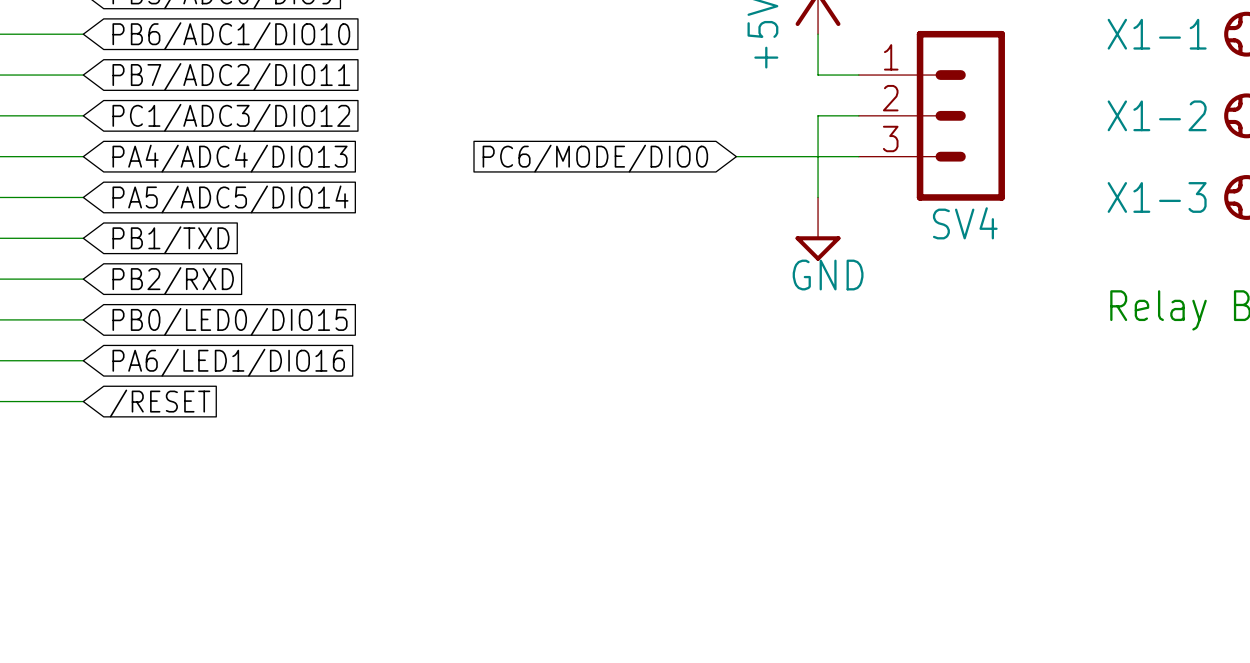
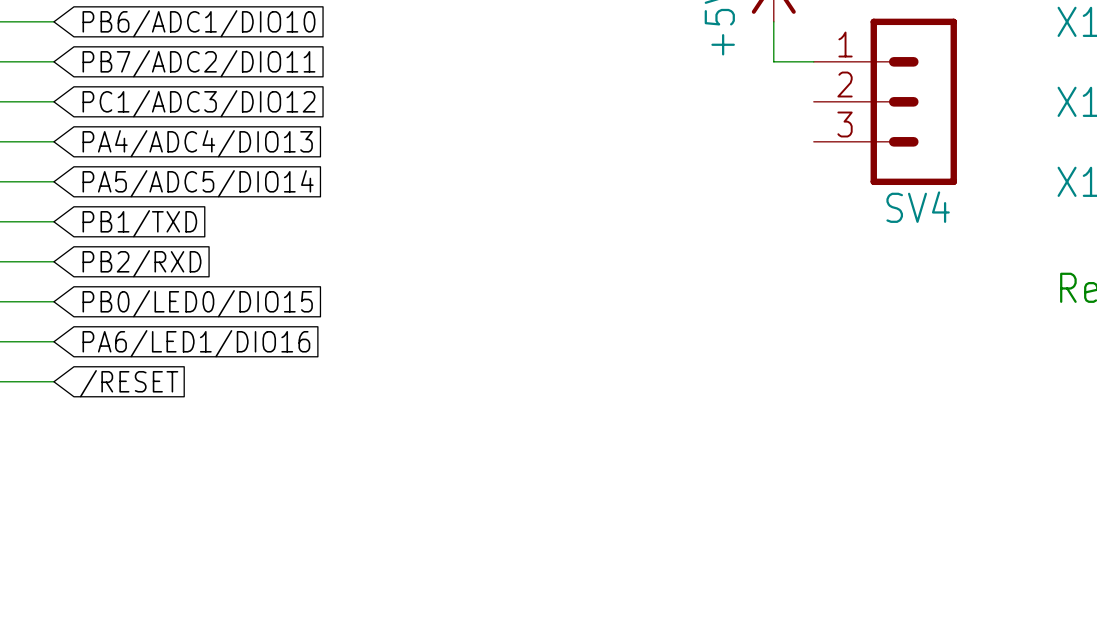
wire: (858, 115) (818, 115) (818, 197) -> none
wire: (736, 156) (858, 156) -> none
global label: PC6/MODE/DIO0 (595, 158) -> none
power symbol: GND (818, 229) -> none

